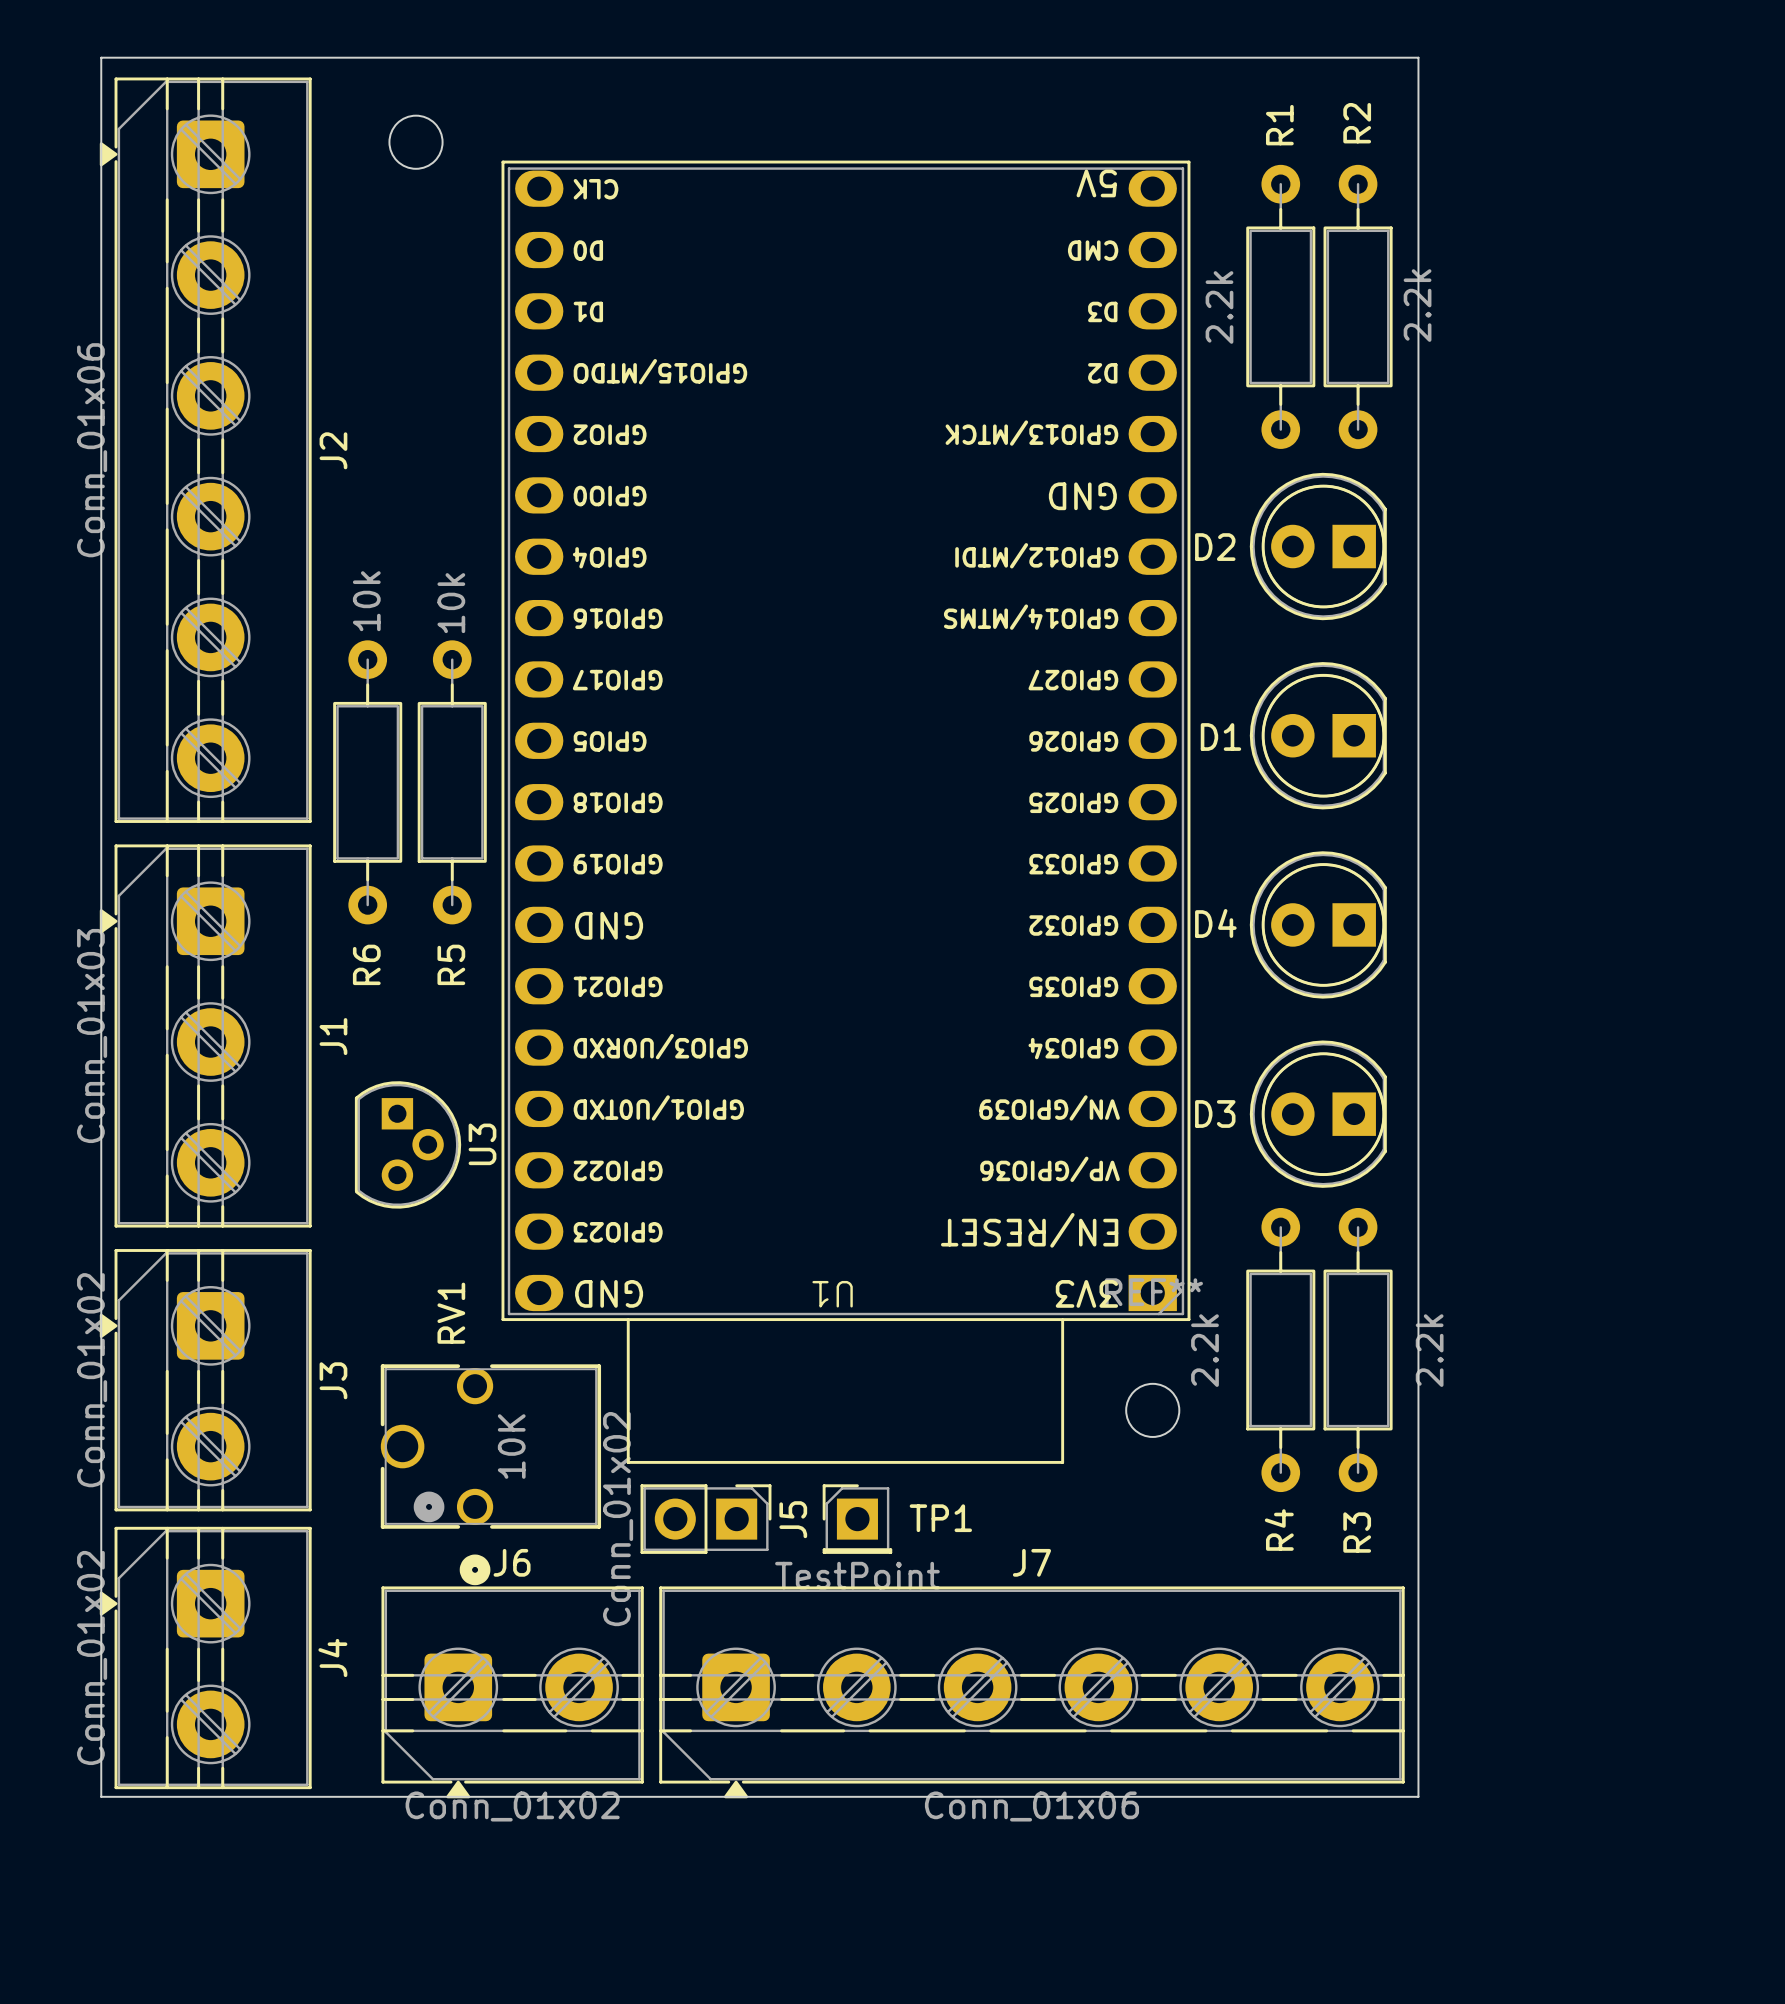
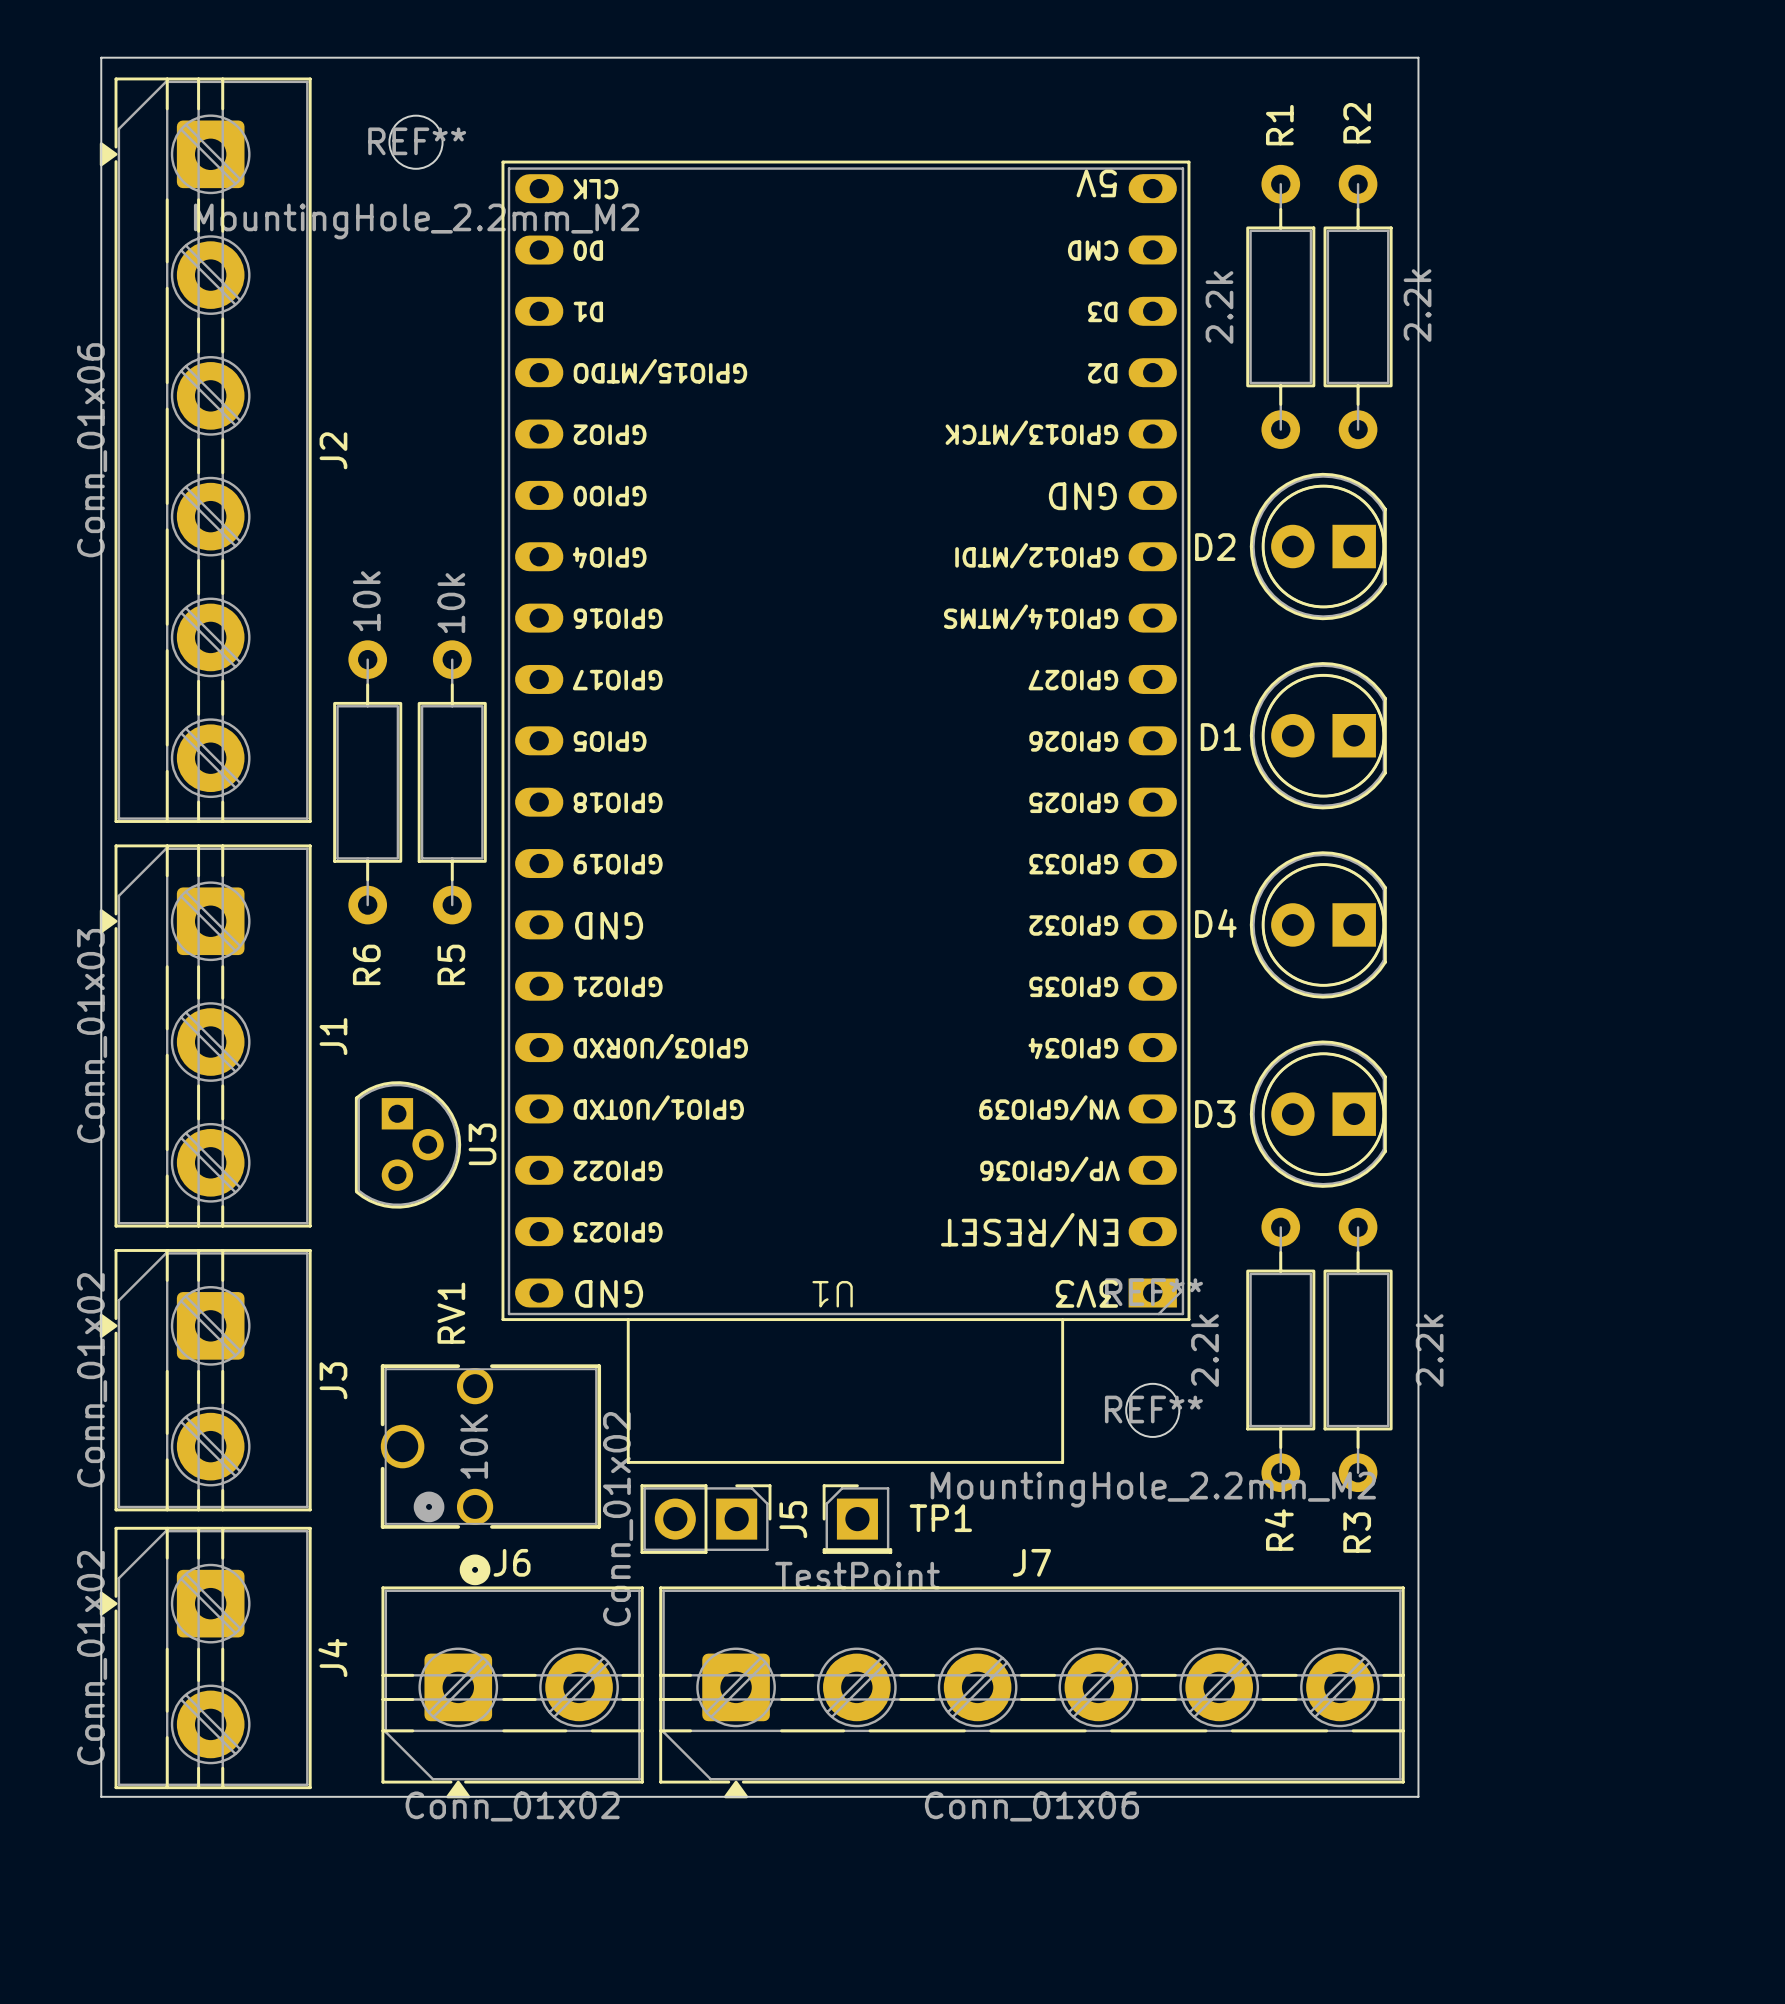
REF** name: none -> REF** (417, 141)
U1 footprint: [501, 160, 1191, 1464] -> [501, 160, 1191, 1464]
REF** value: none -> MountingHole_2.2mm_M2 (416, 221)
REF** name: none -> REF** (1153, 1409)
RV1 value position: 10K (511, 1446) -> 10K (474, 1446)
REF** value: none -> MountingHole_2.2mm_M2 (1153, 1489)

